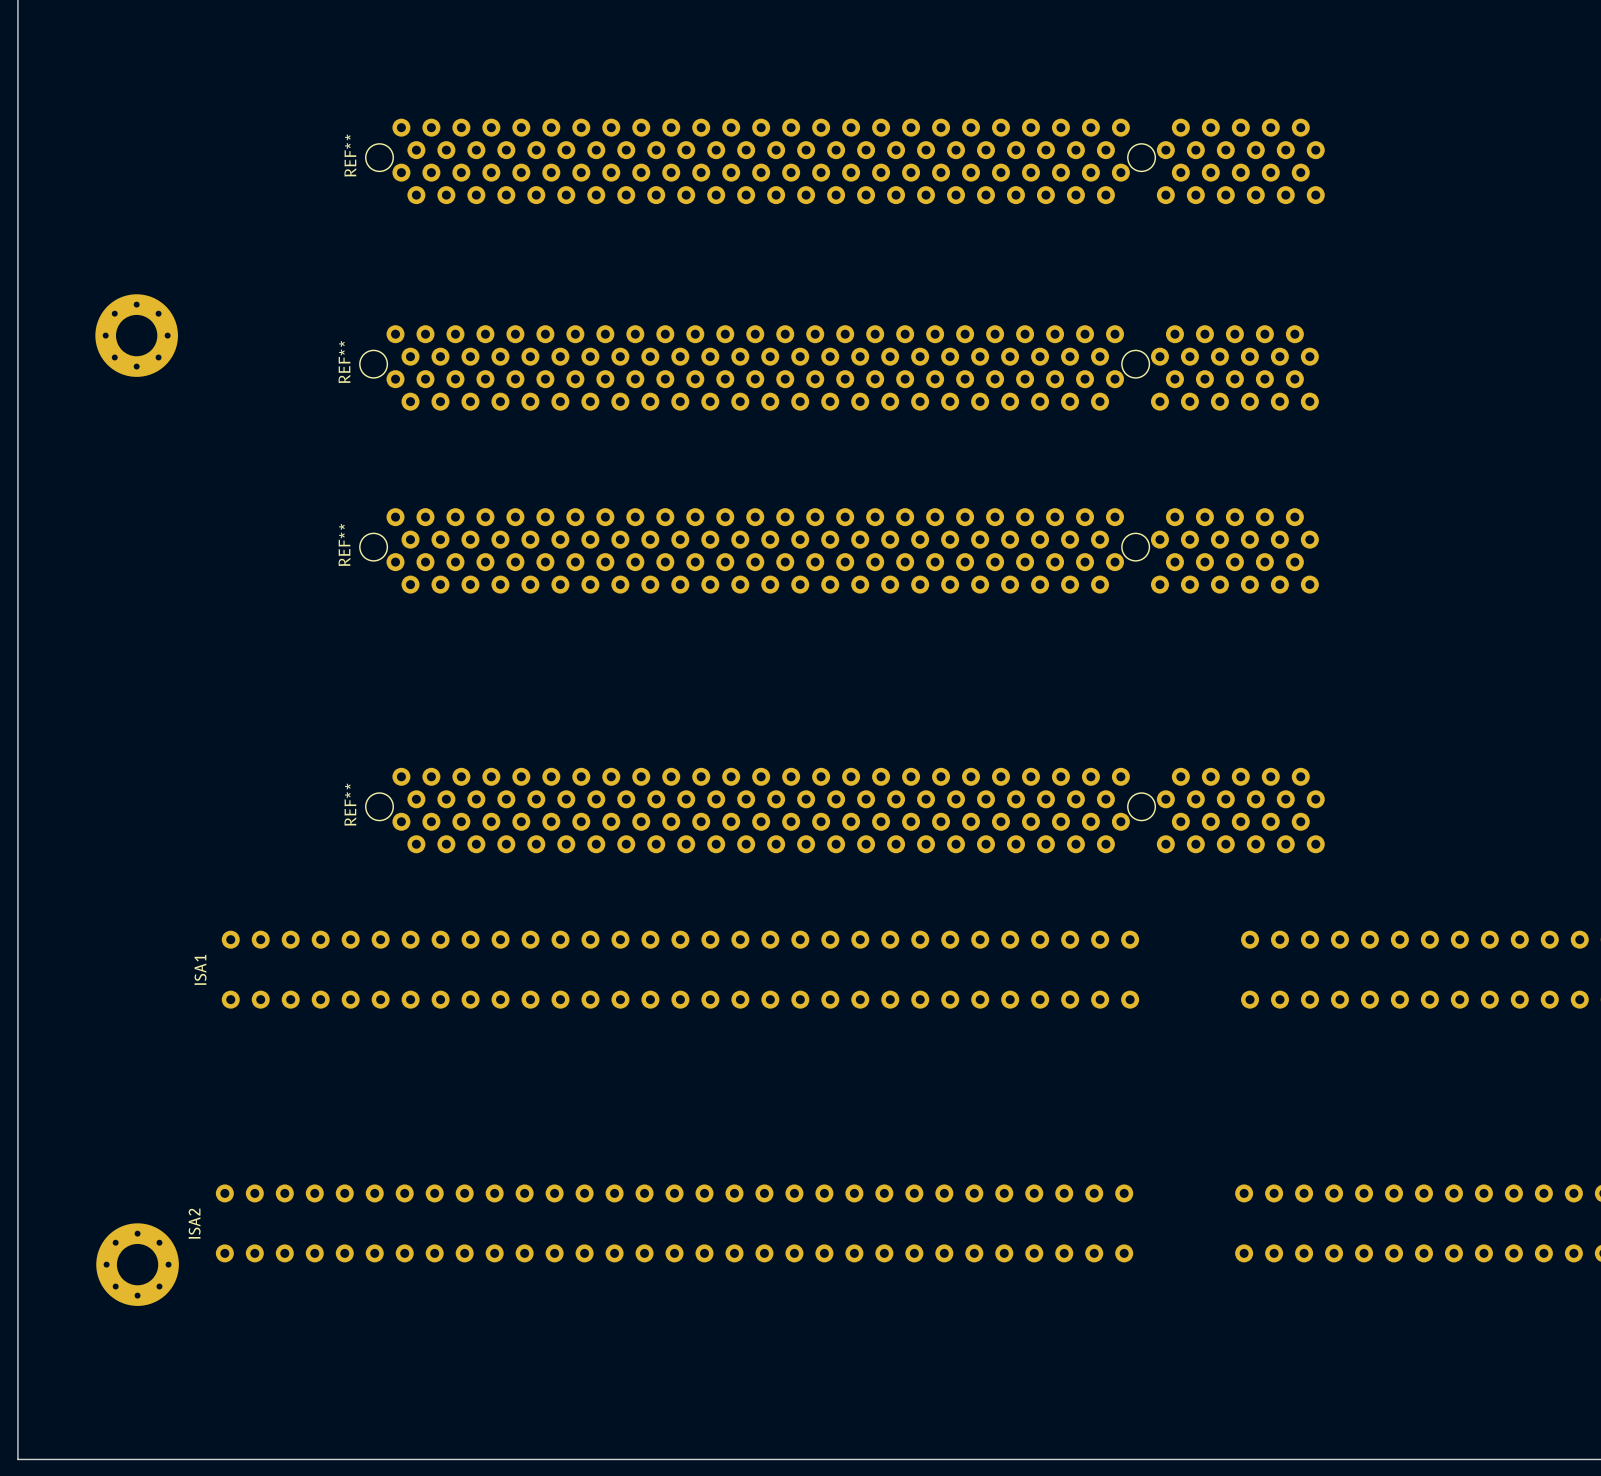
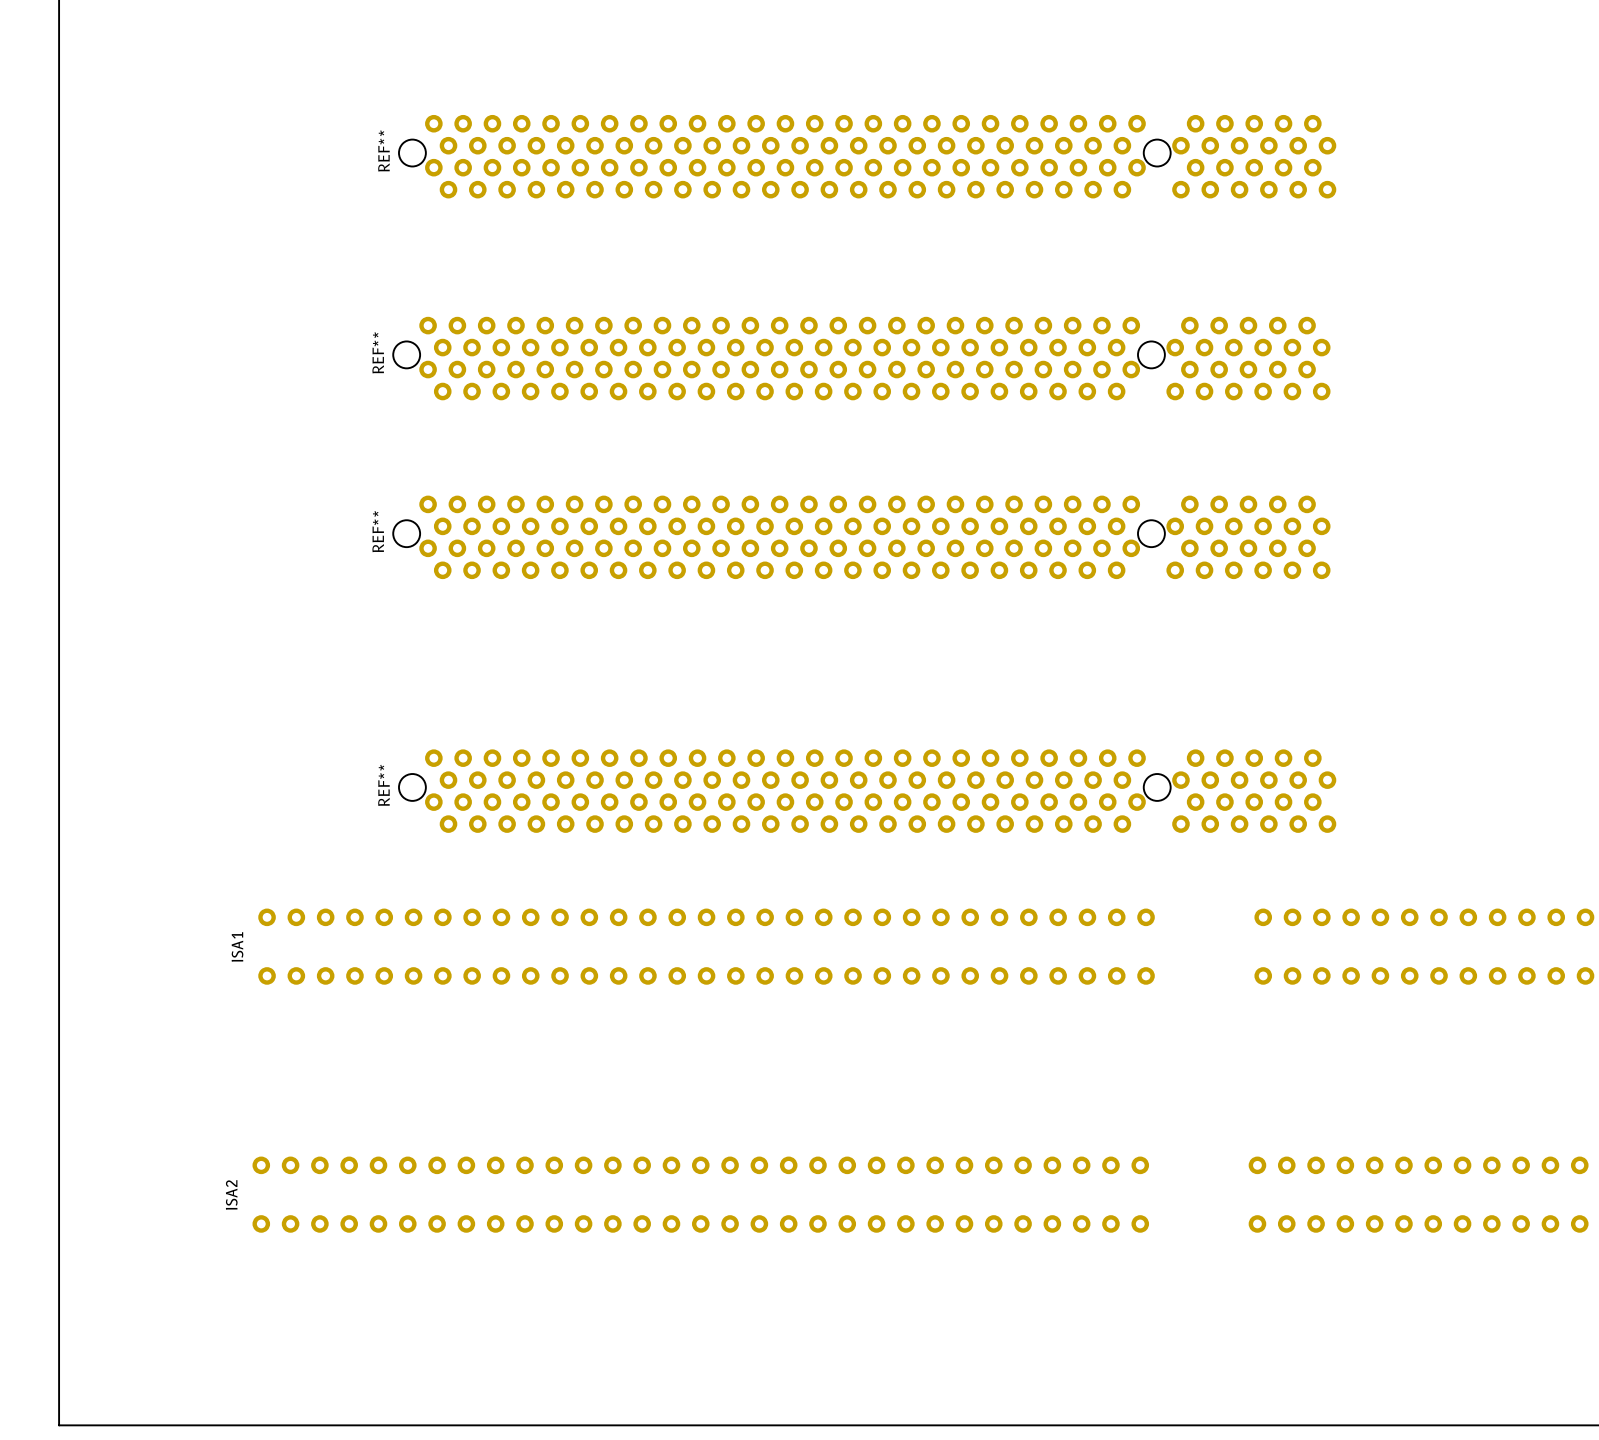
part: (136, 335) -> none
part: (137, 1264) -> none

